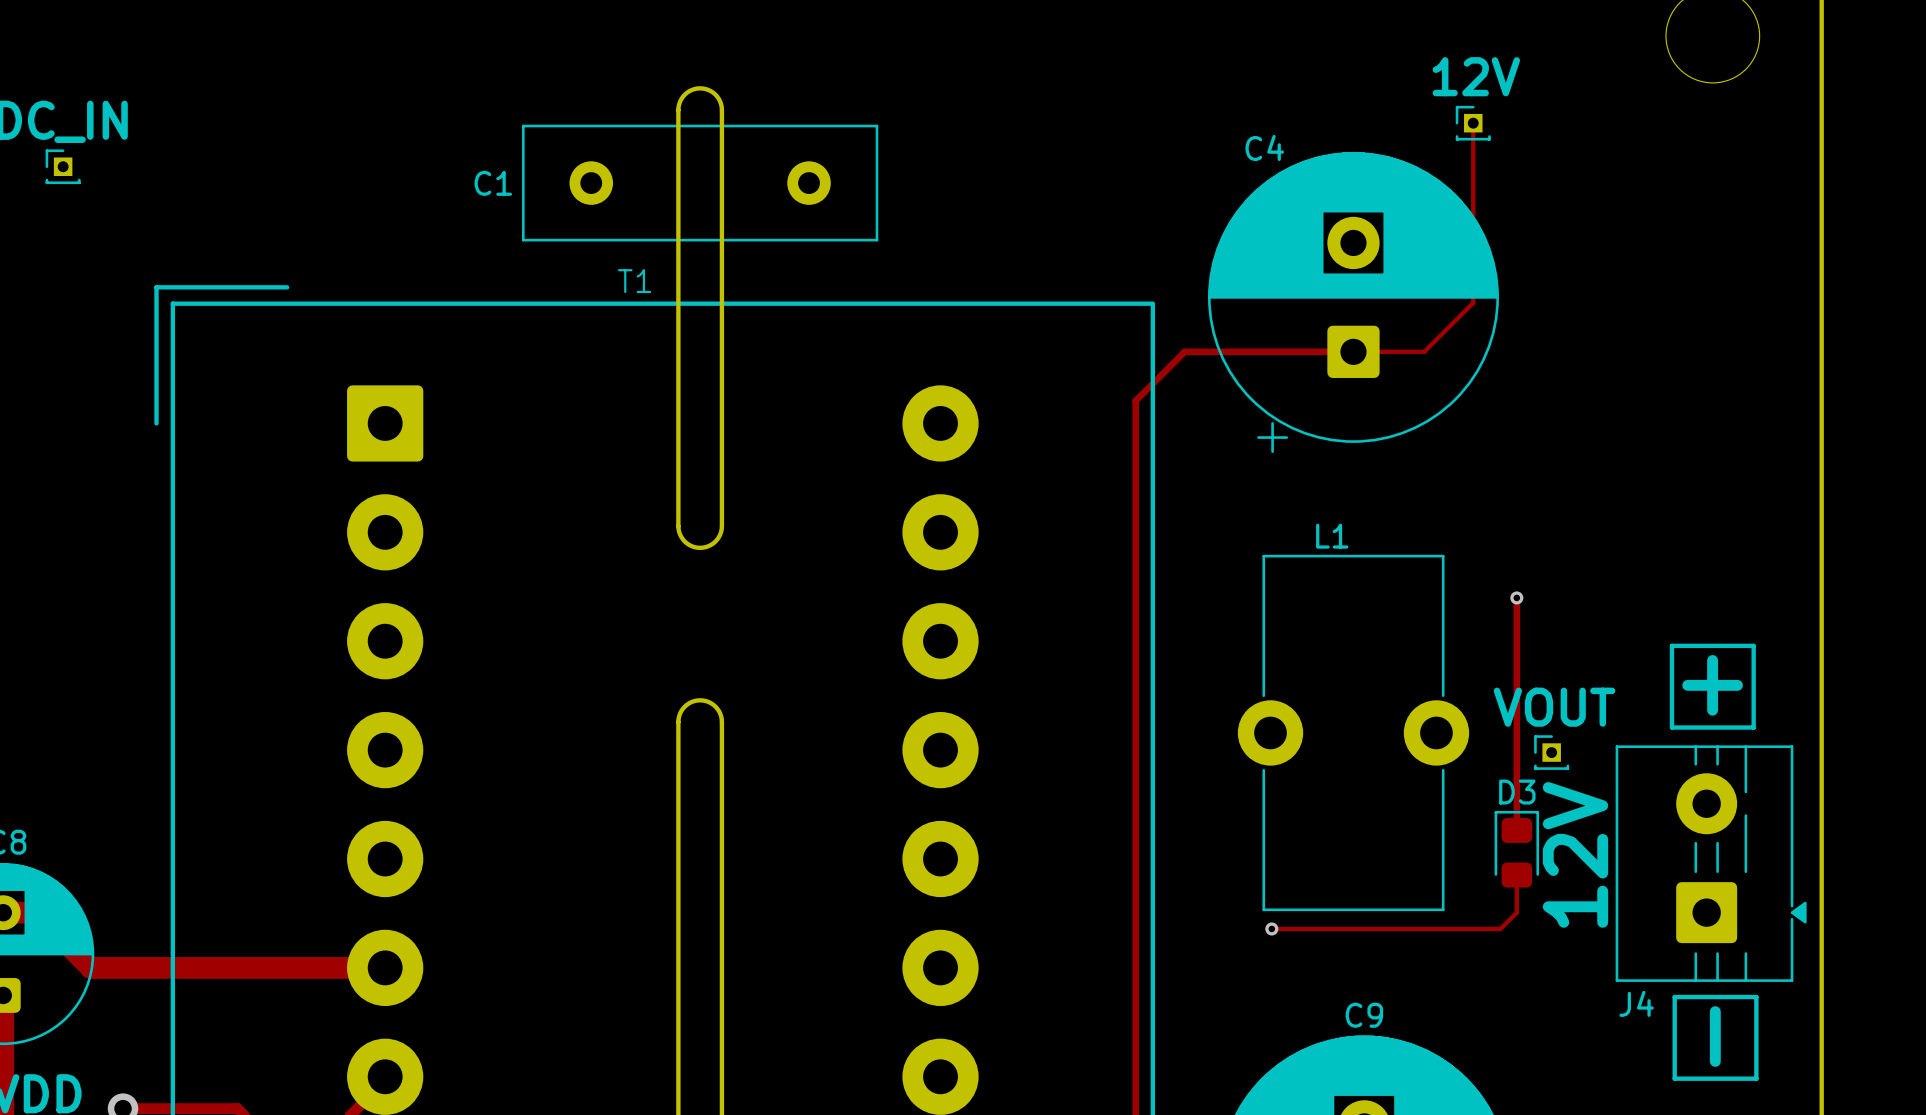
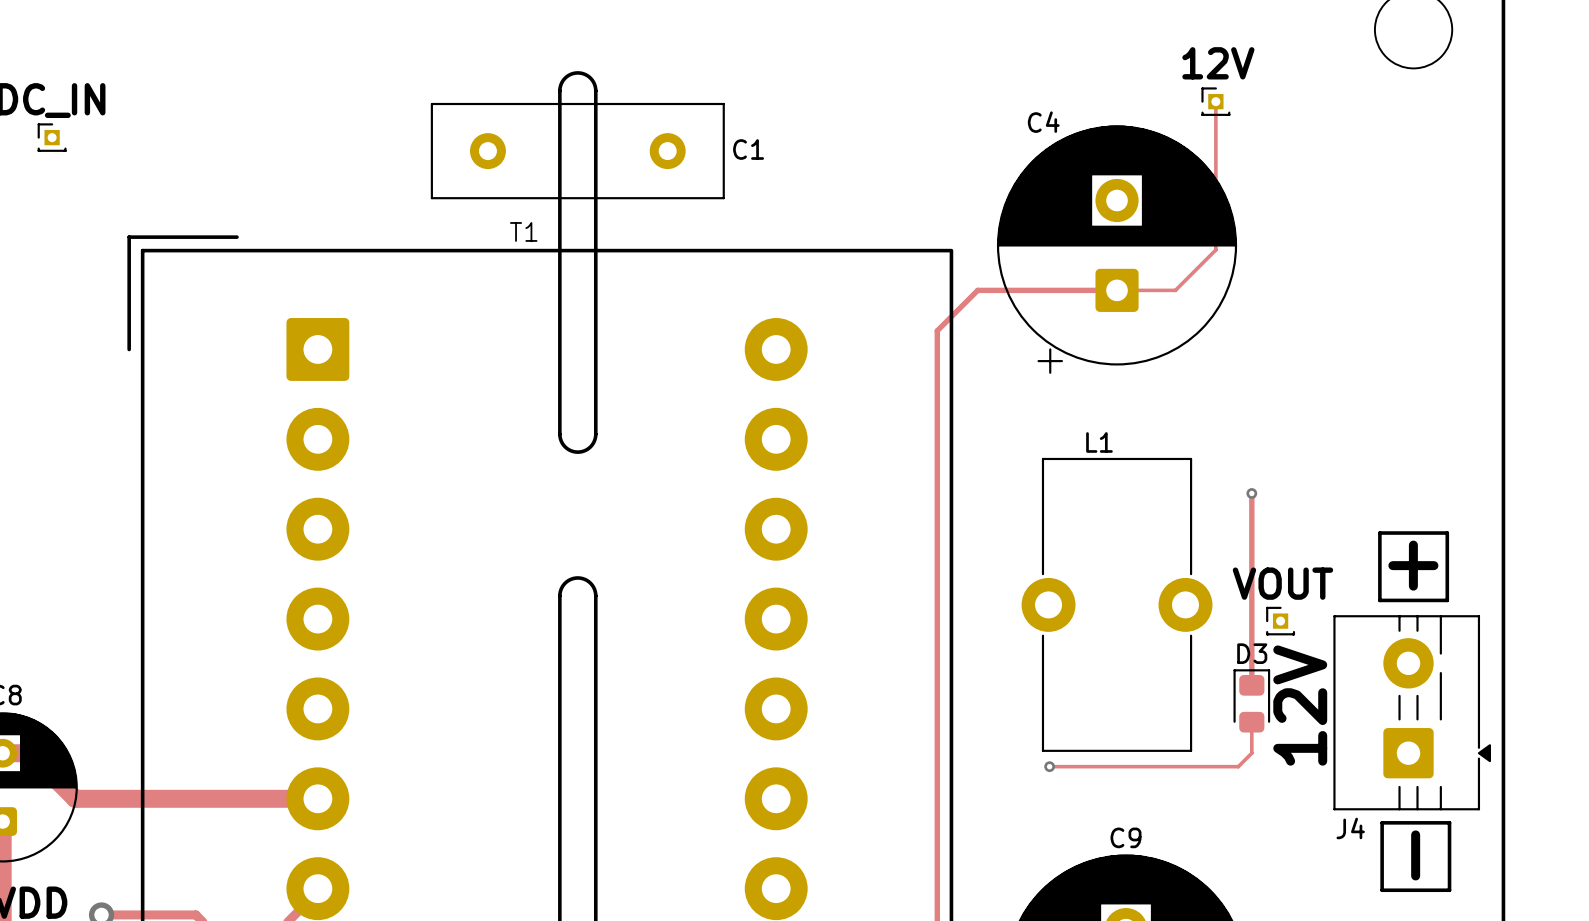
C1 name position: C1 (493, 183) -> C1 (748, 149)

